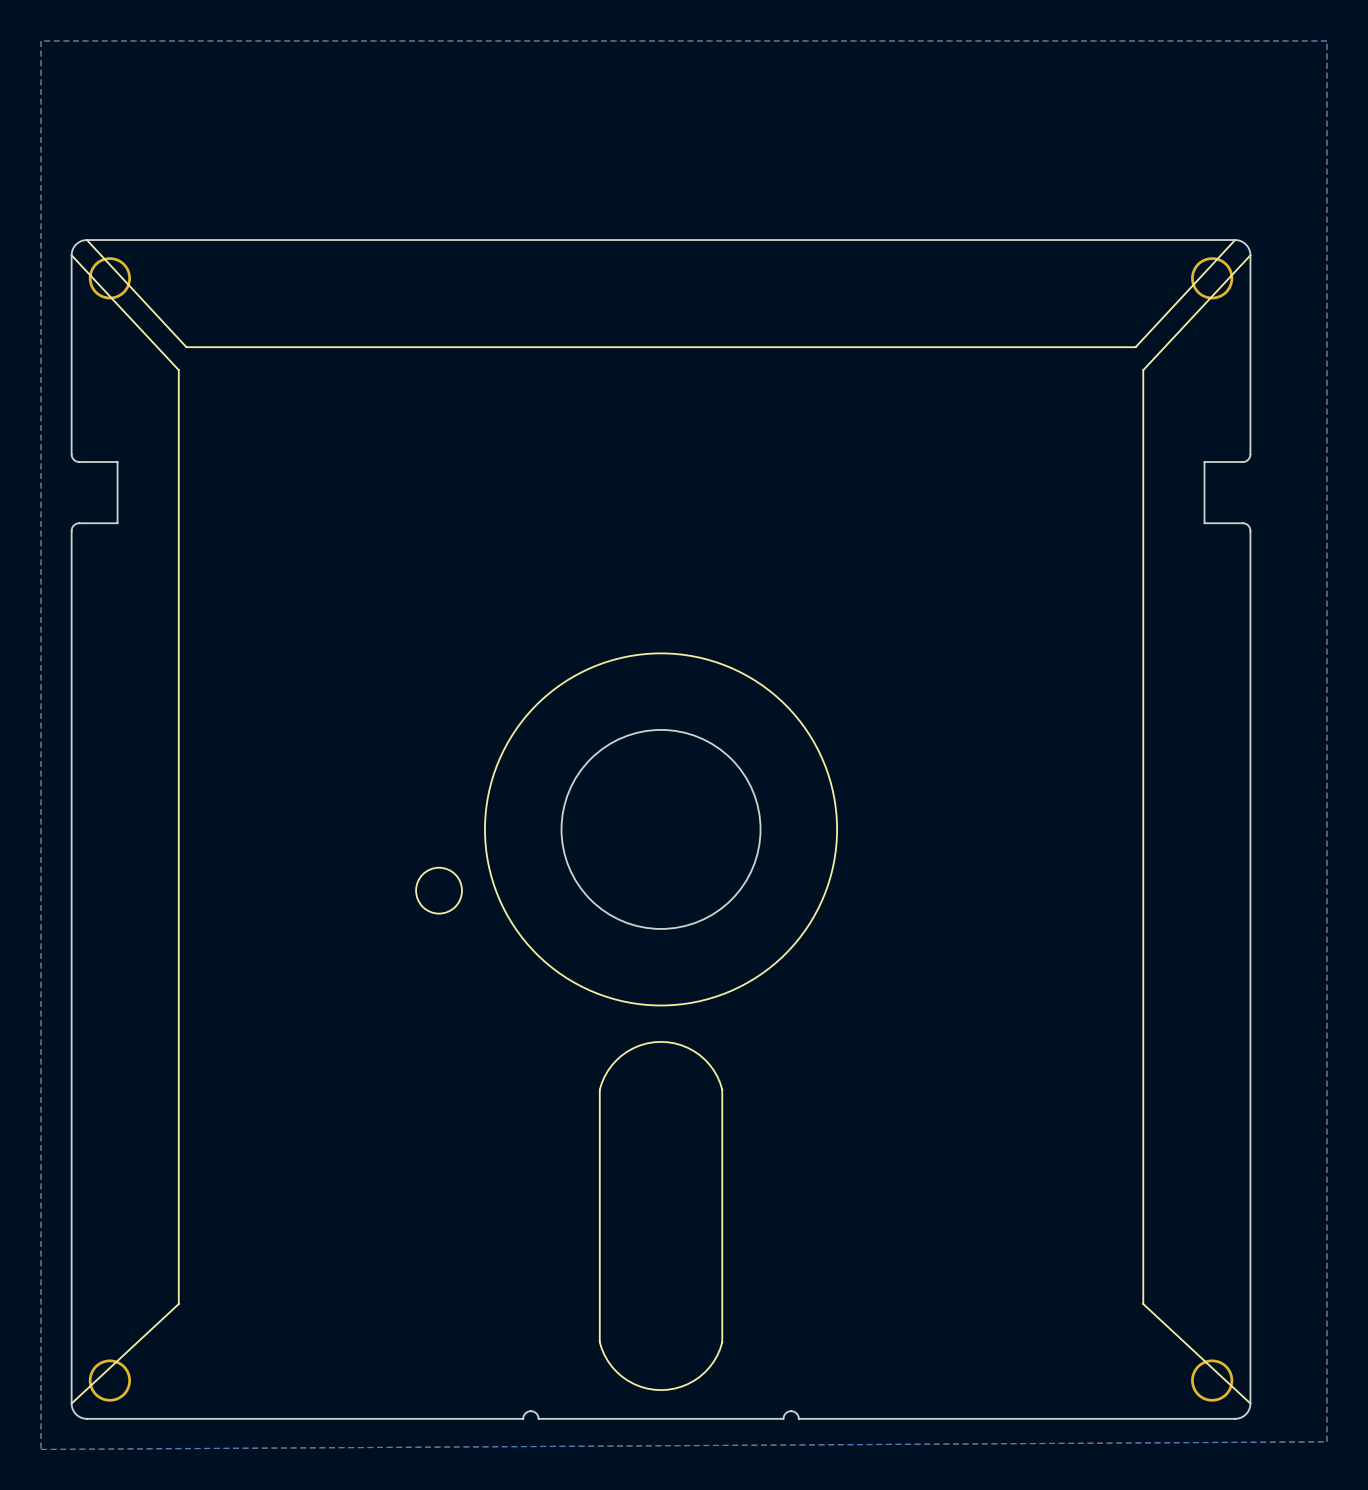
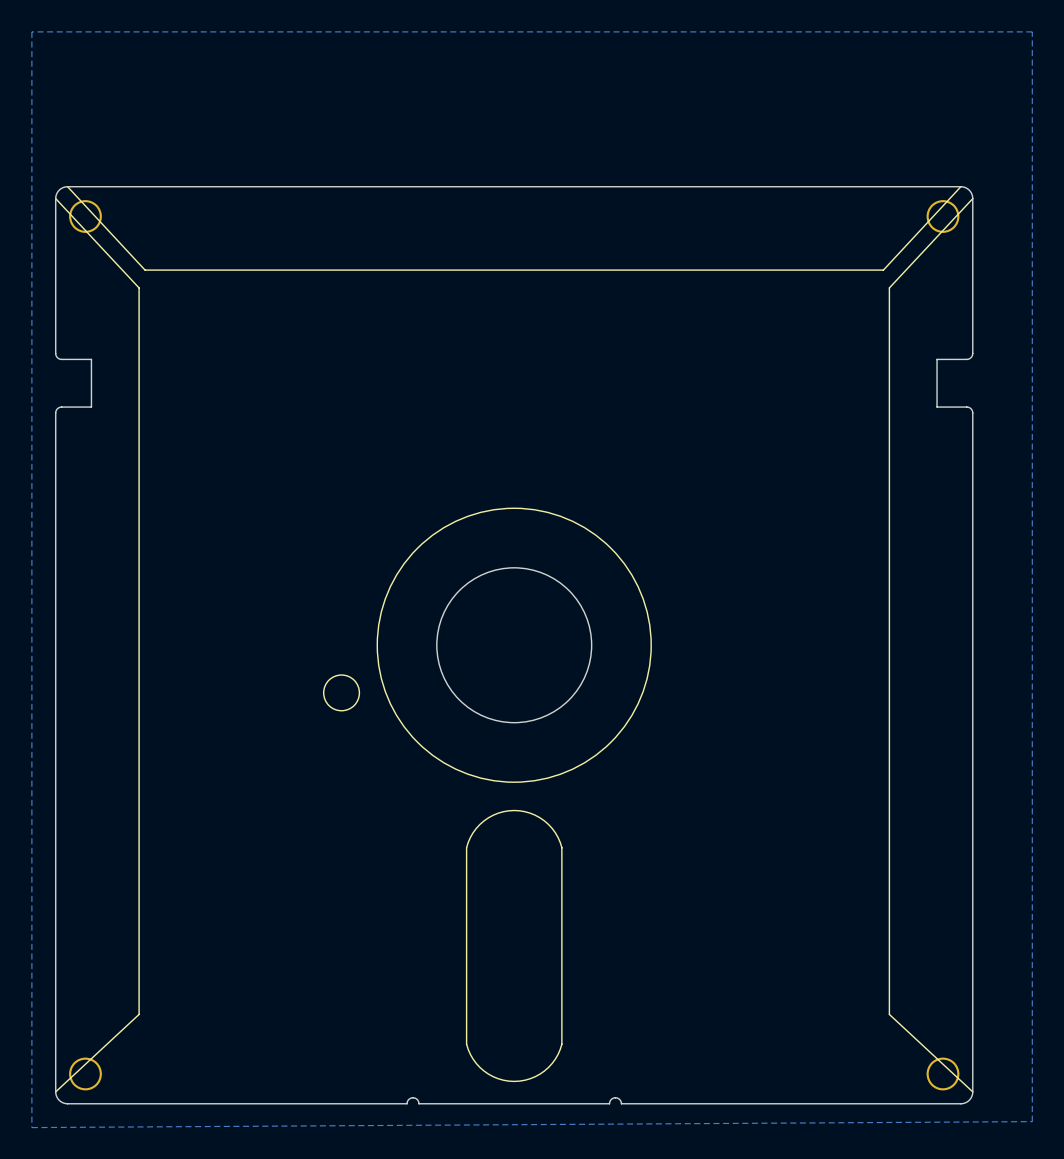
top zone outline: (1326, 41) (41, 41) (41, 1449) (1326, 1441) (1326, 41) -> none

